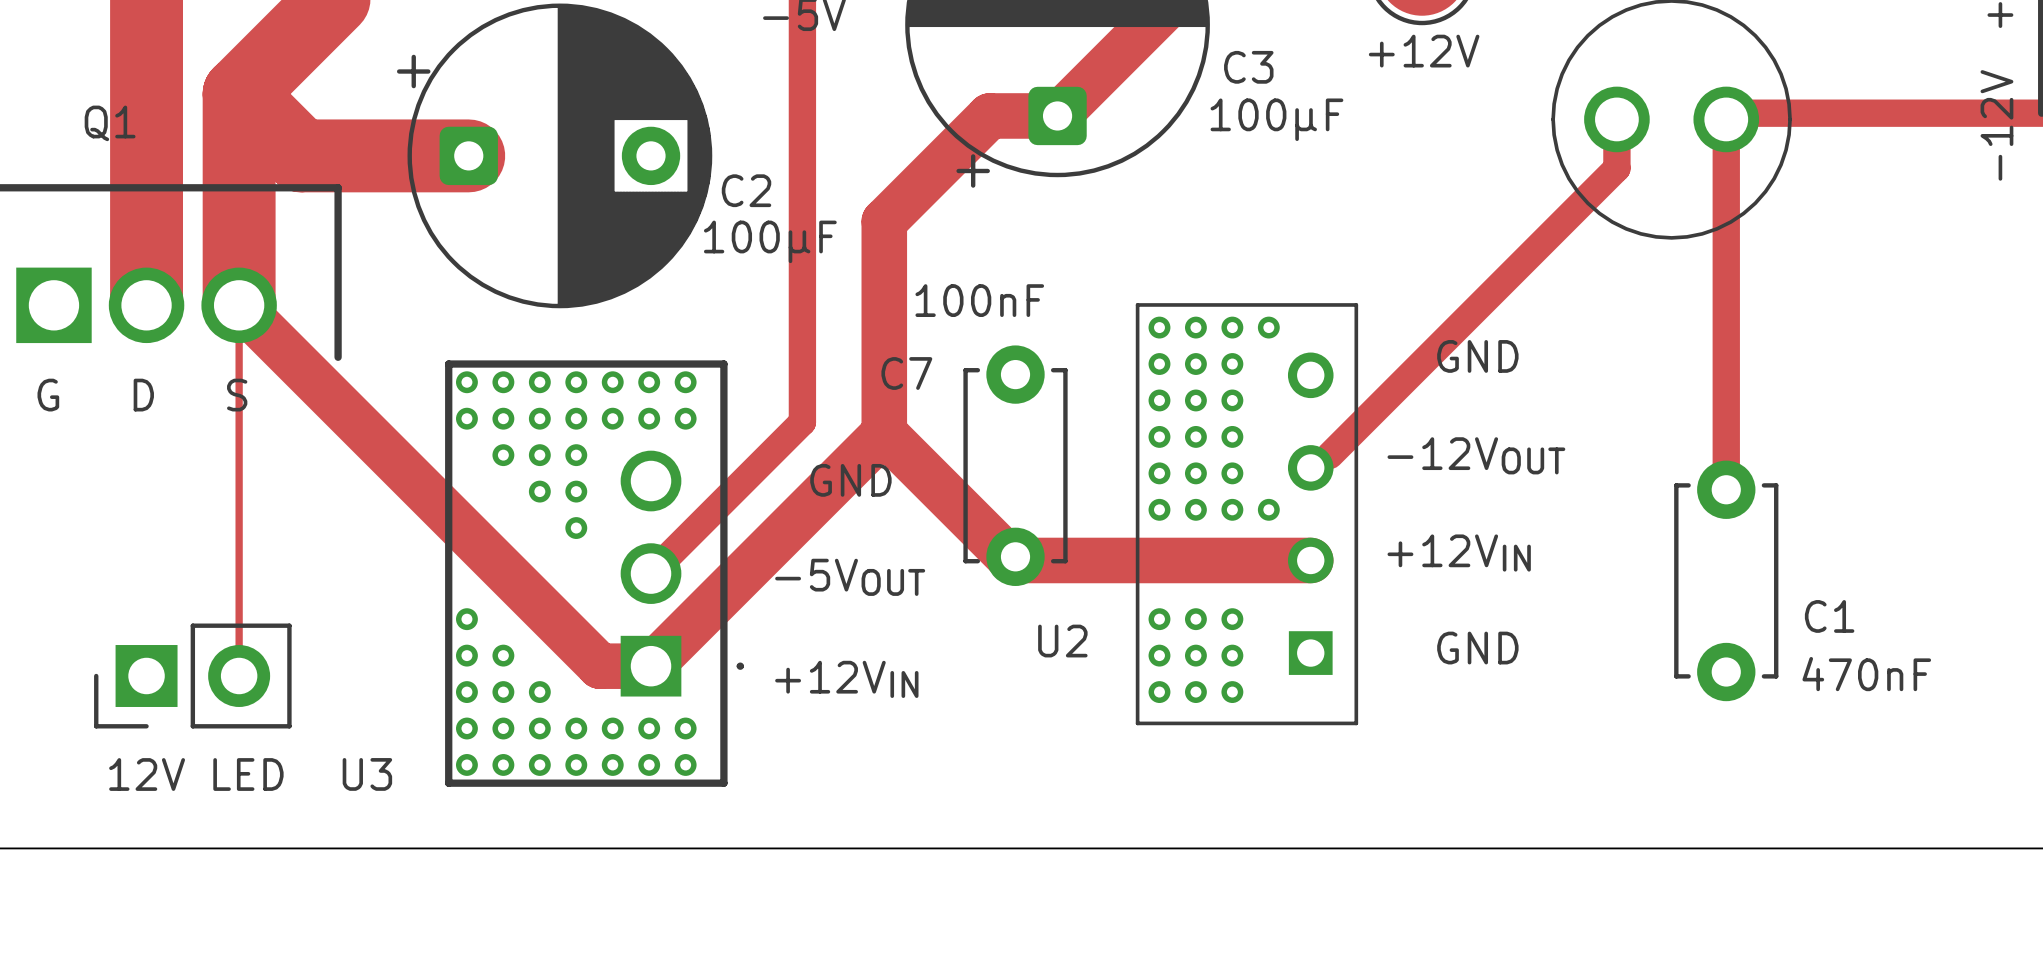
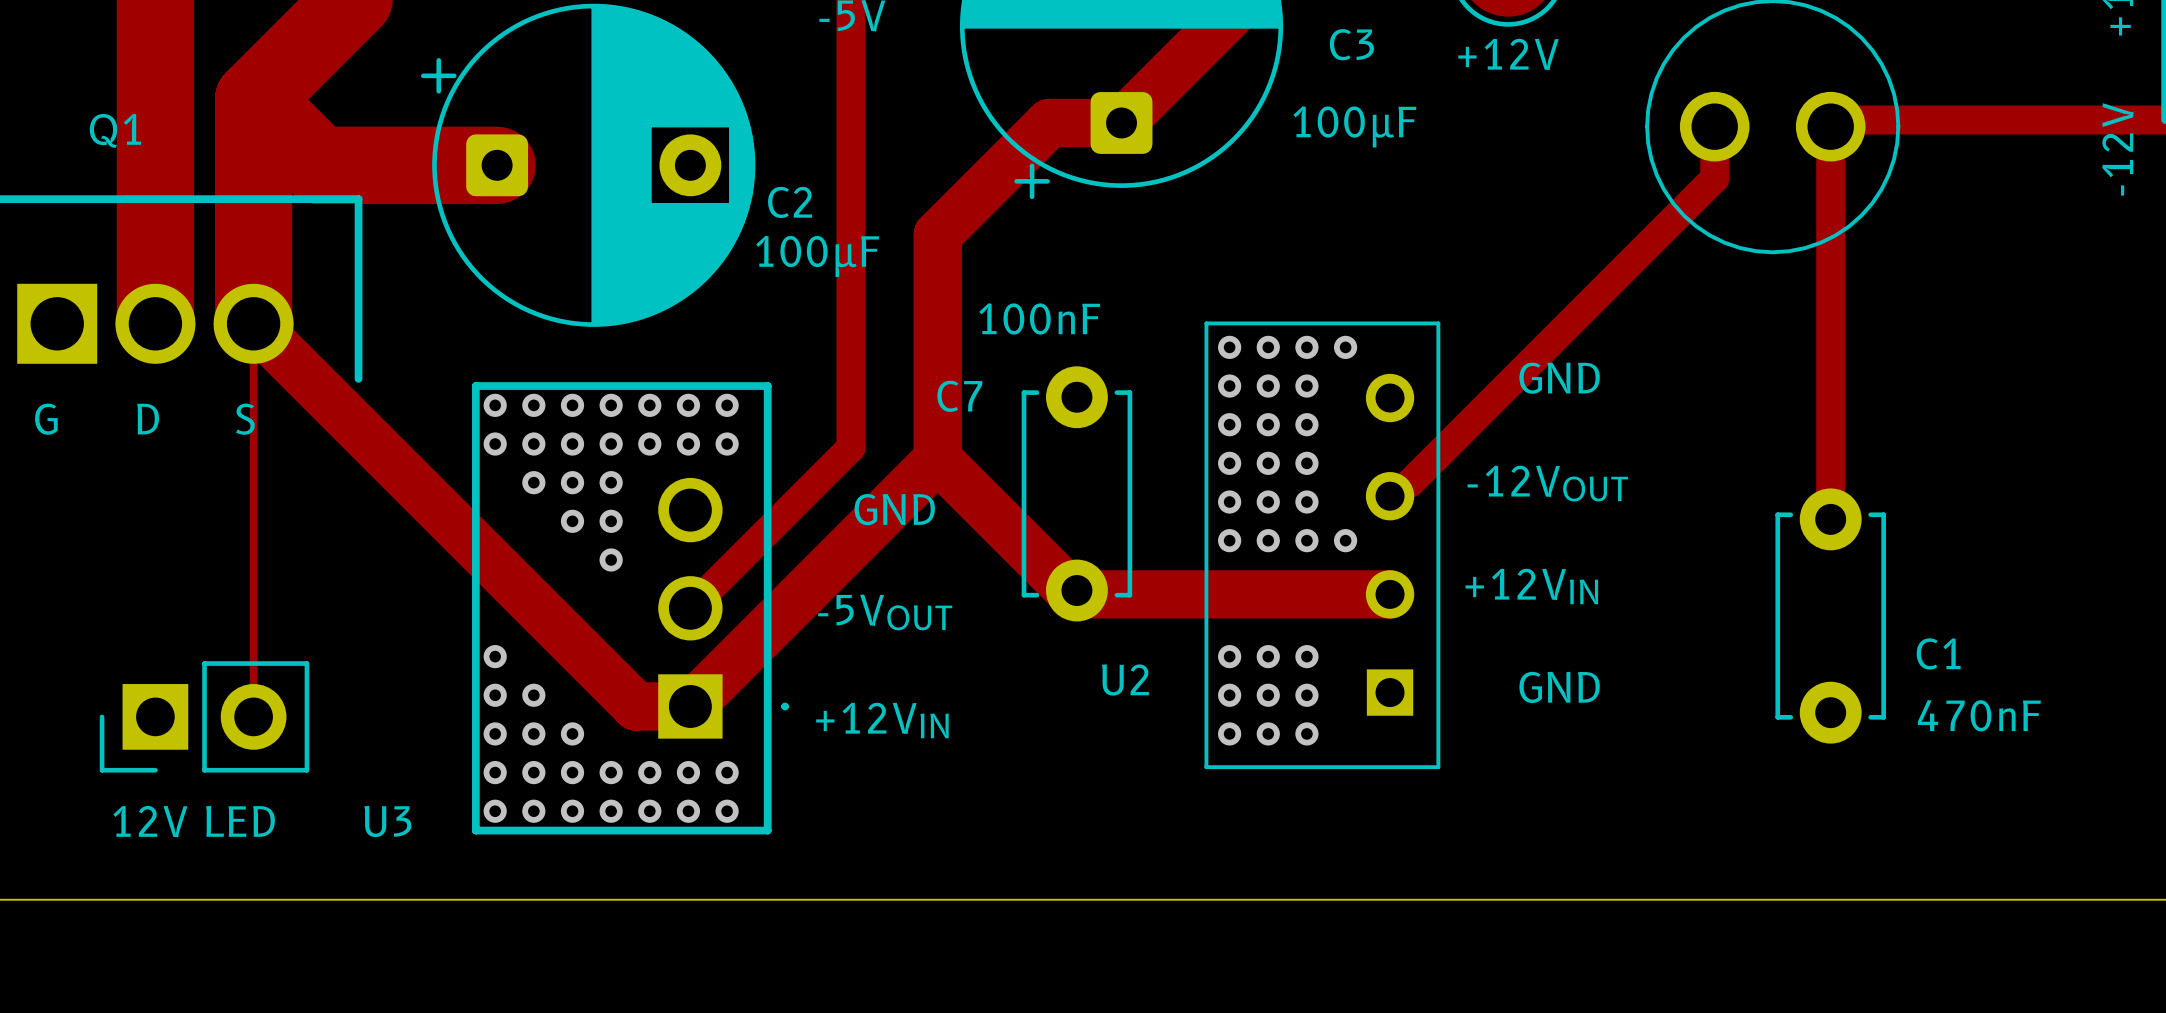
C3 name position: C3 (1248, 67) -> C3 (1351, 44)

